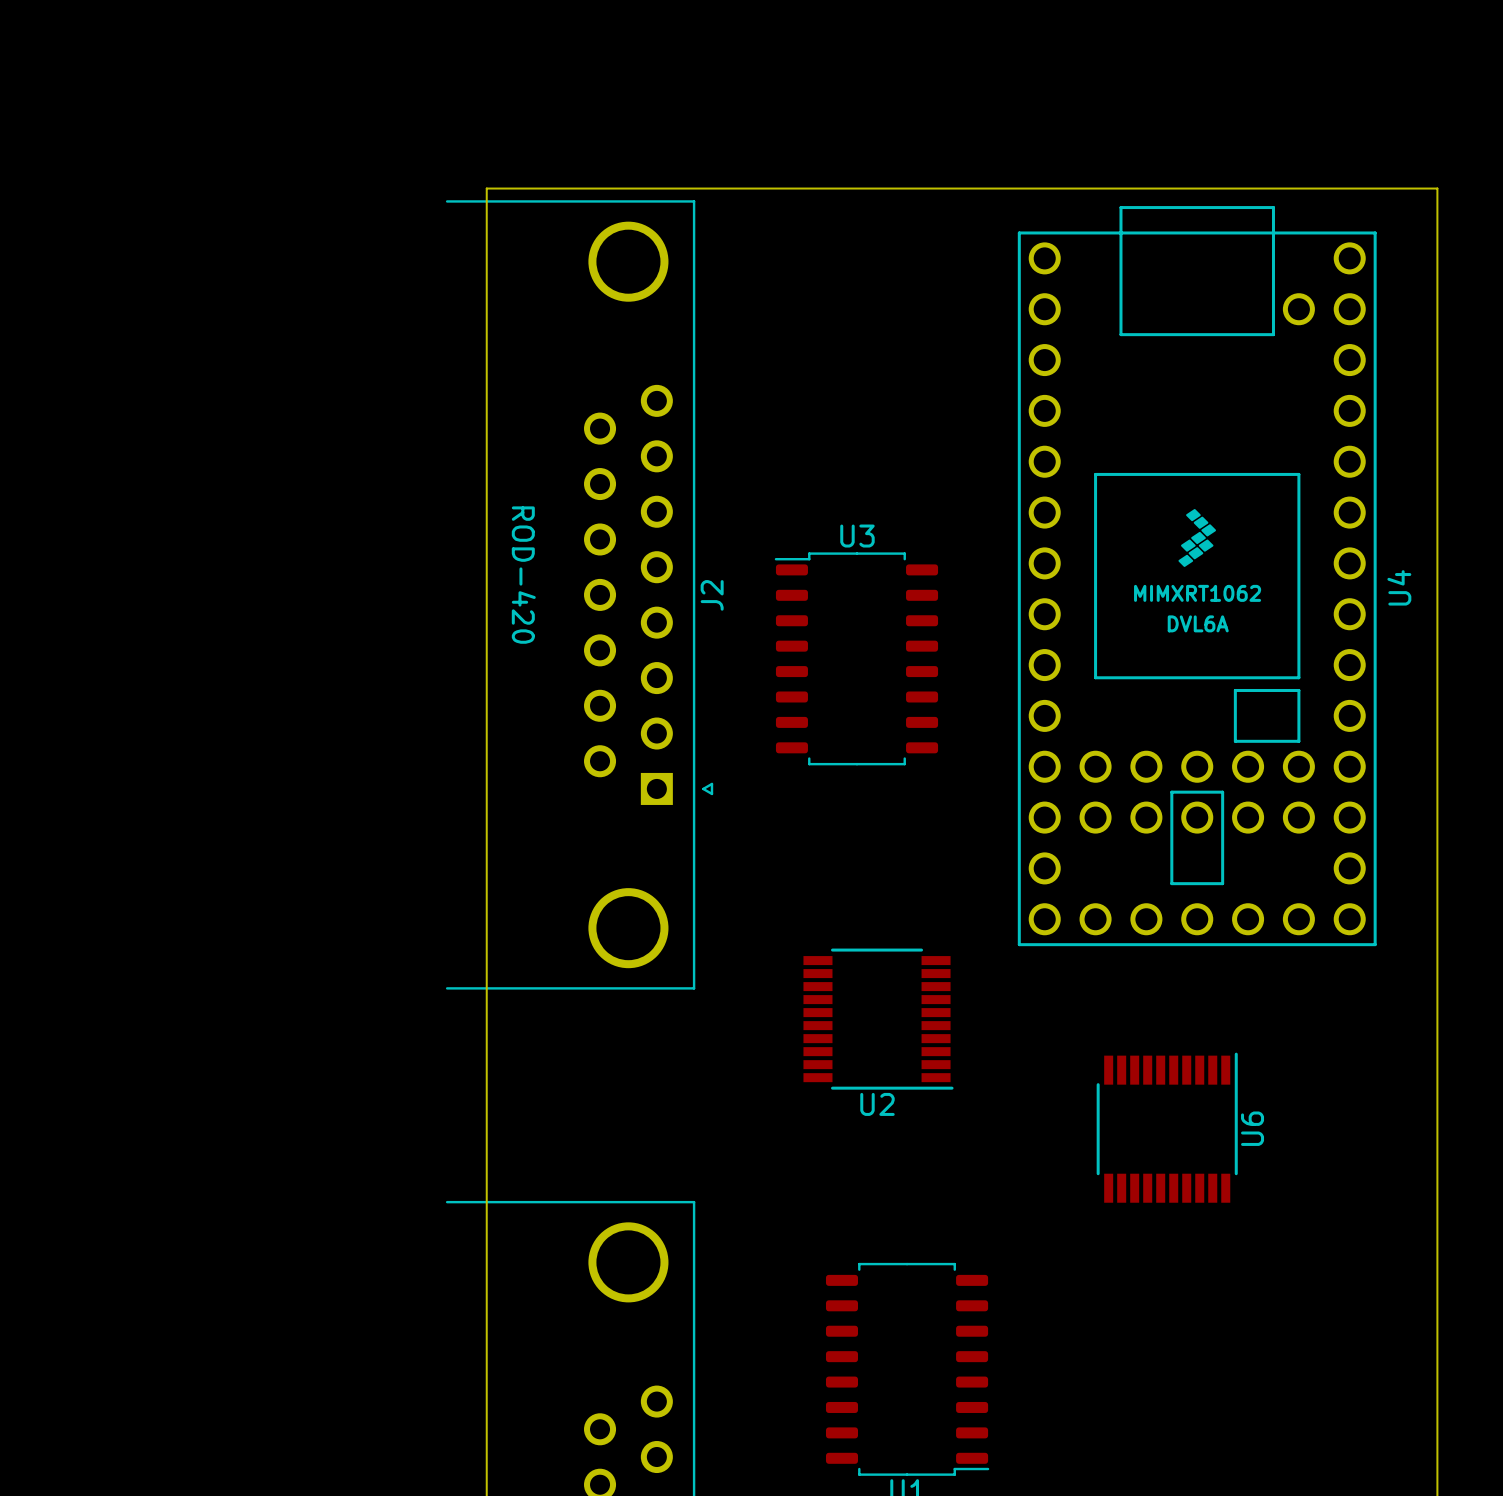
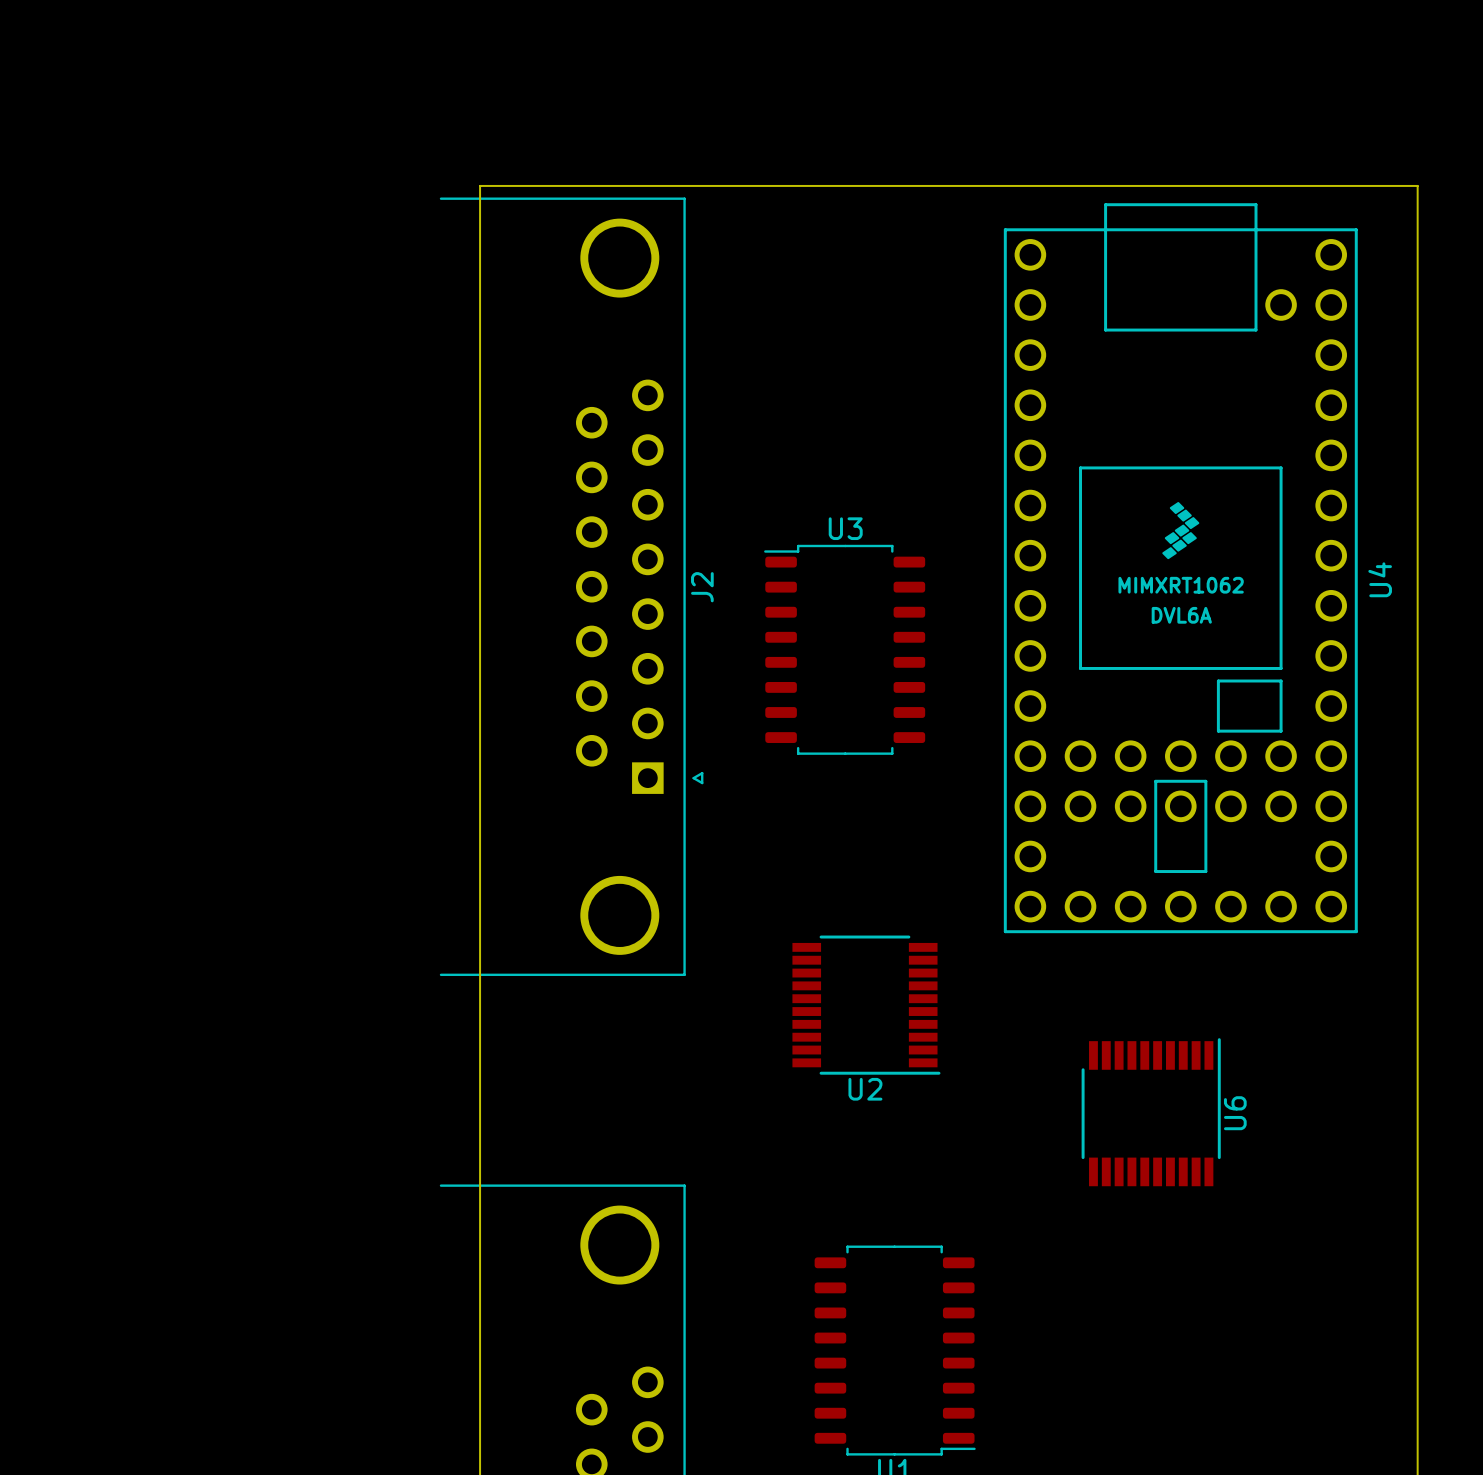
text: ROD-420 (523, 575) -> none

